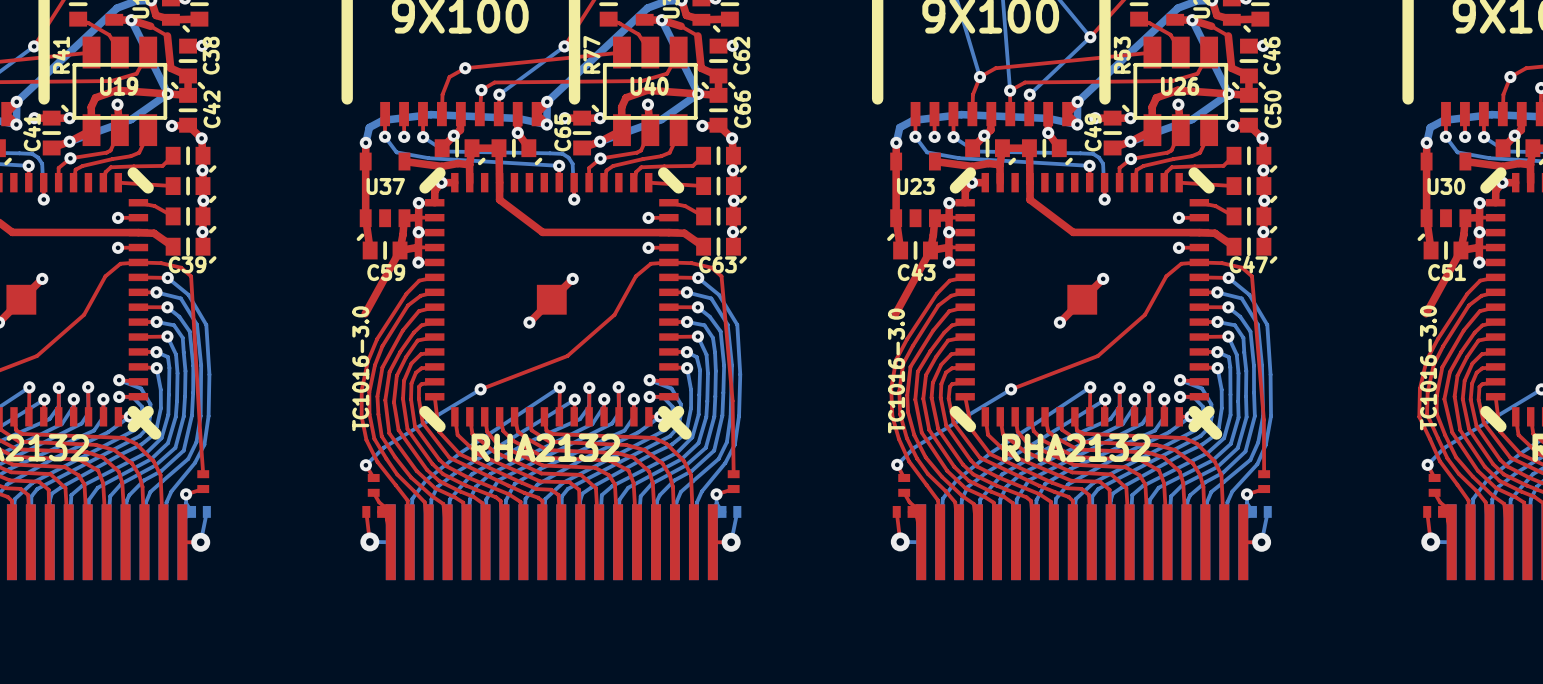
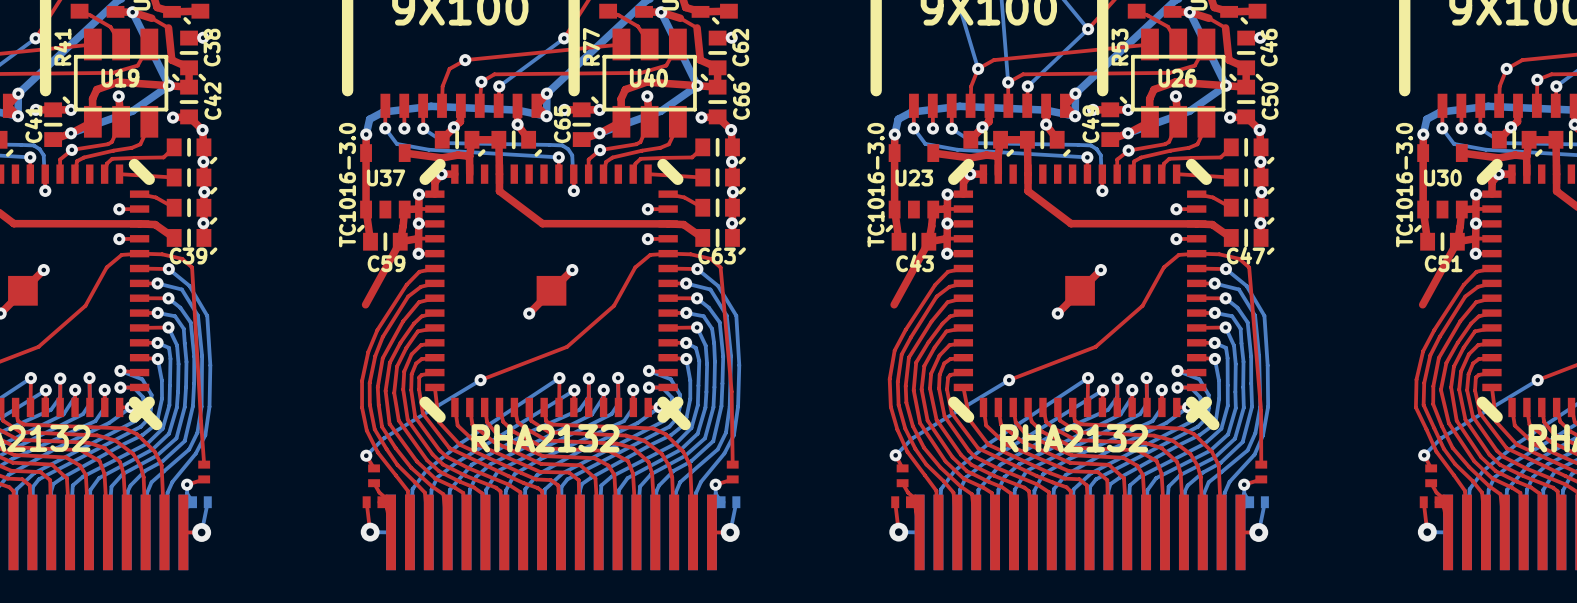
U30 value position: TC1016-3.0 (1428, 367) -> TC1016-3.0 (1404, 185)
U37 value position: TC1016-3.0 (360, 368) -> TC1016-3.0 (347, 185)
U23 value position: TC1016-3.0 (896, 370) -> TC1016-3.0 (876, 185)

